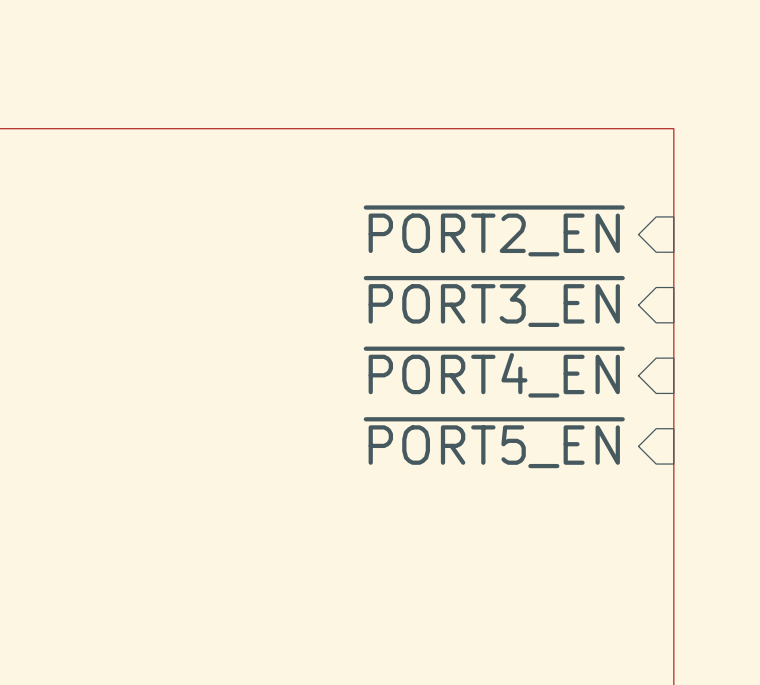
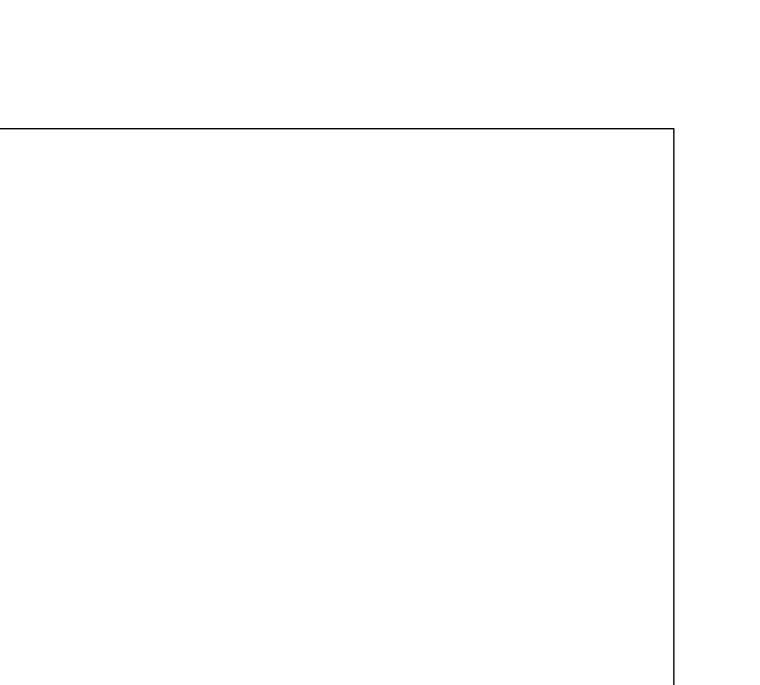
sheet pin: ~{PORT2_EN} (494, 230) -> none
sheet pin: ~{PORT3_EN} (494, 301) -> none
sheet pin: ~{PORT4_EN} (494, 372) -> none
sheet pin: ~{PORT5_EN} (494, 442) -> none

